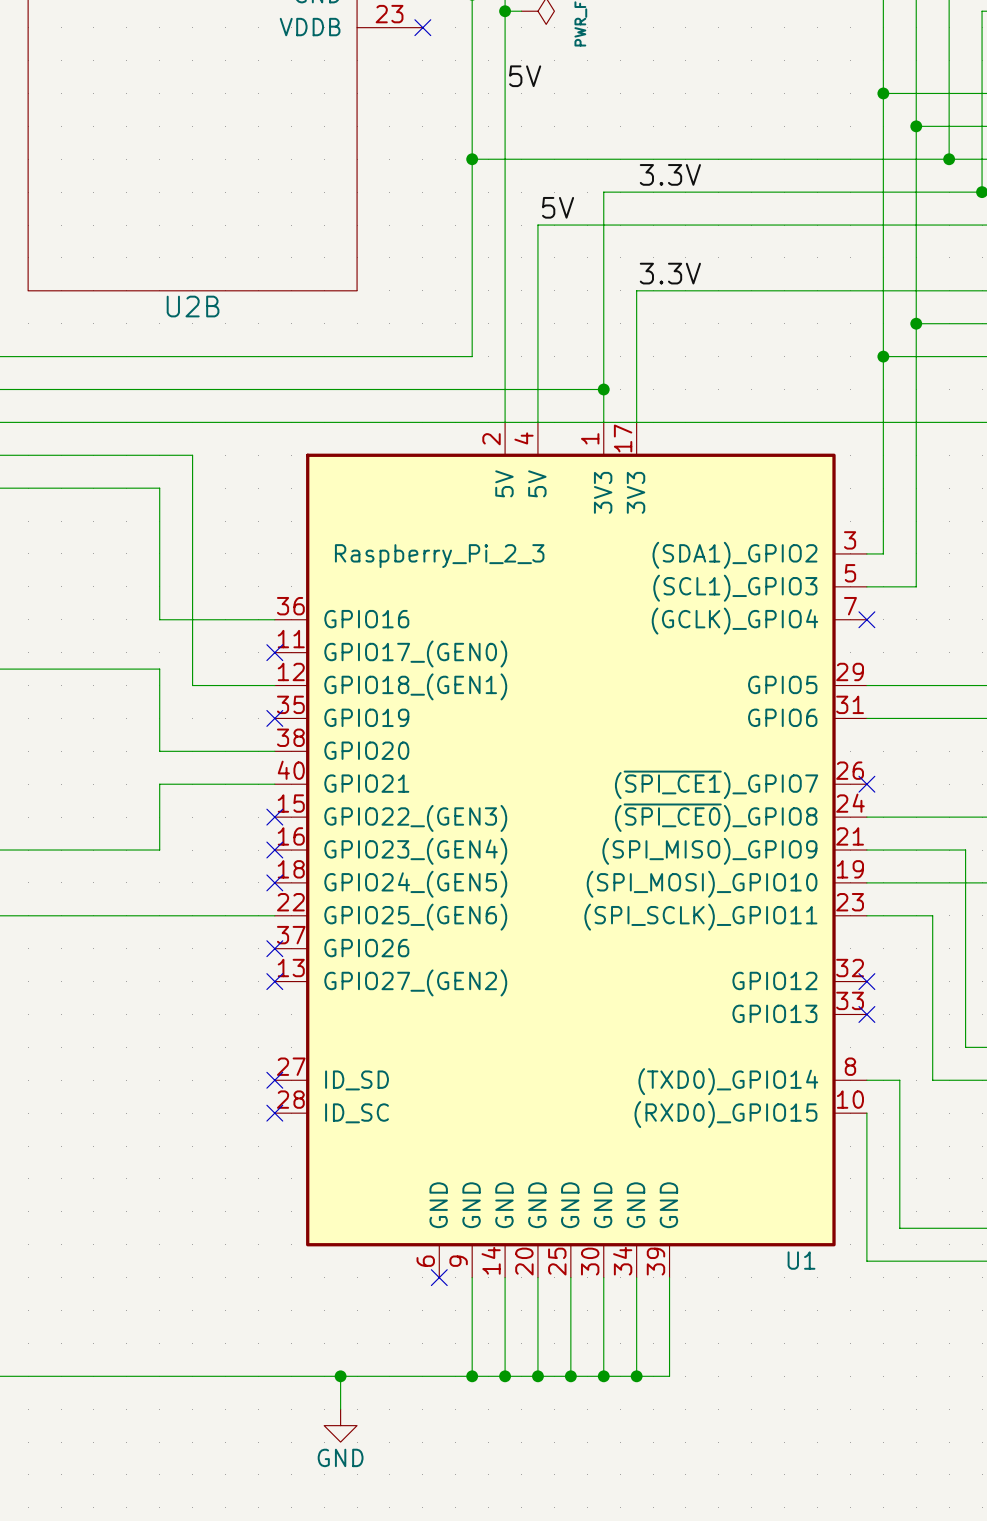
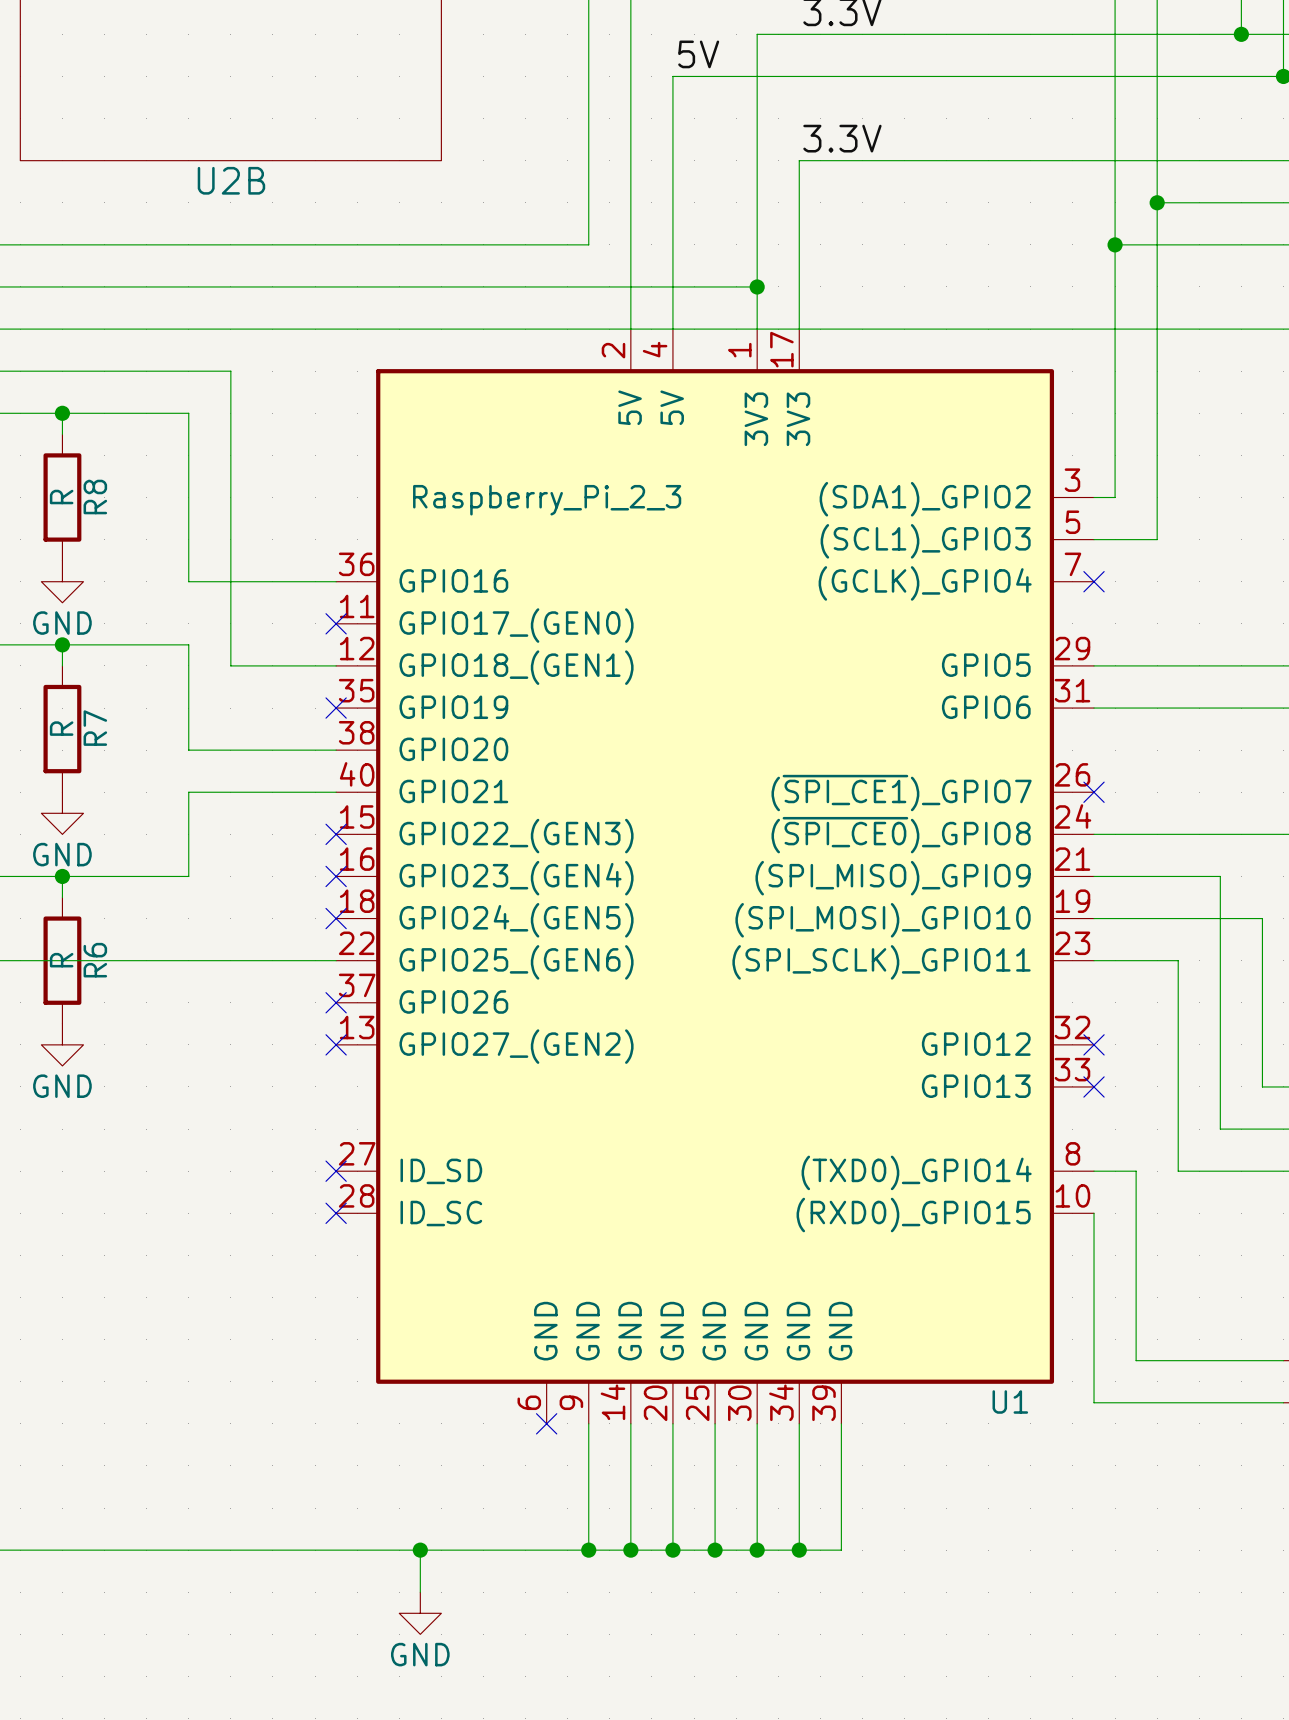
wire: none -> (62, 413) (62, 434)
junction: none -> (62, 413)
R8: none -> R (62, 497)
power symbol: none -> GND (62, 581)
wire: none -> (62, 644) (62, 665)
junction: none -> (62, 644)
R7: none -> R (62, 729)
power symbol: none -> GND (62, 813)
wire: none -> (62, 876) (62, 897)
junction: none -> (62, 876)
R6: none -> R (62, 960)
power symbol: none -> GND (62, 1044)

